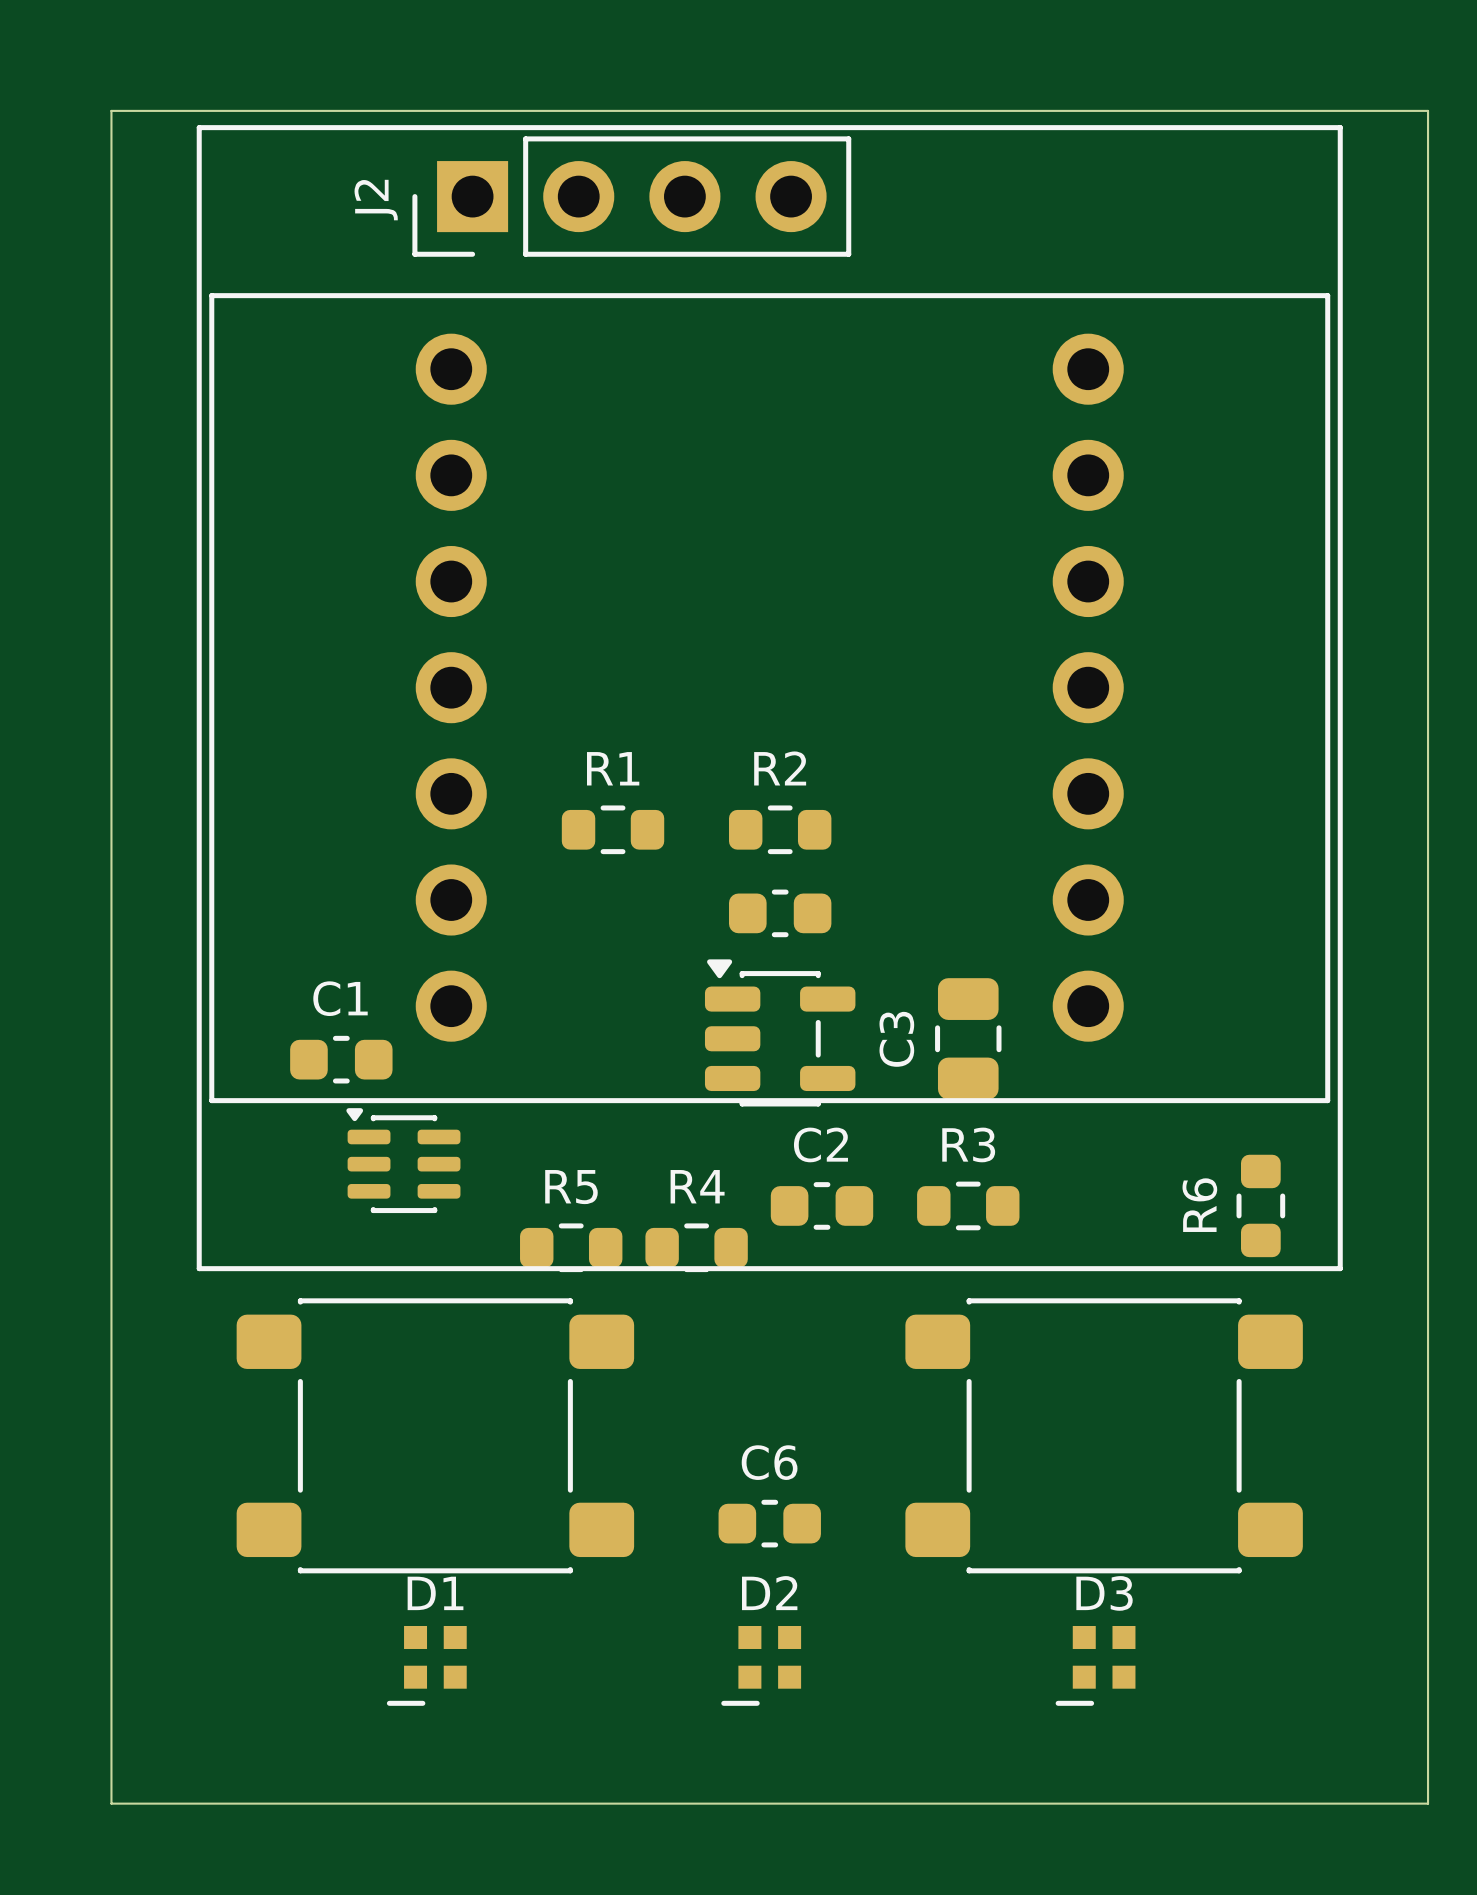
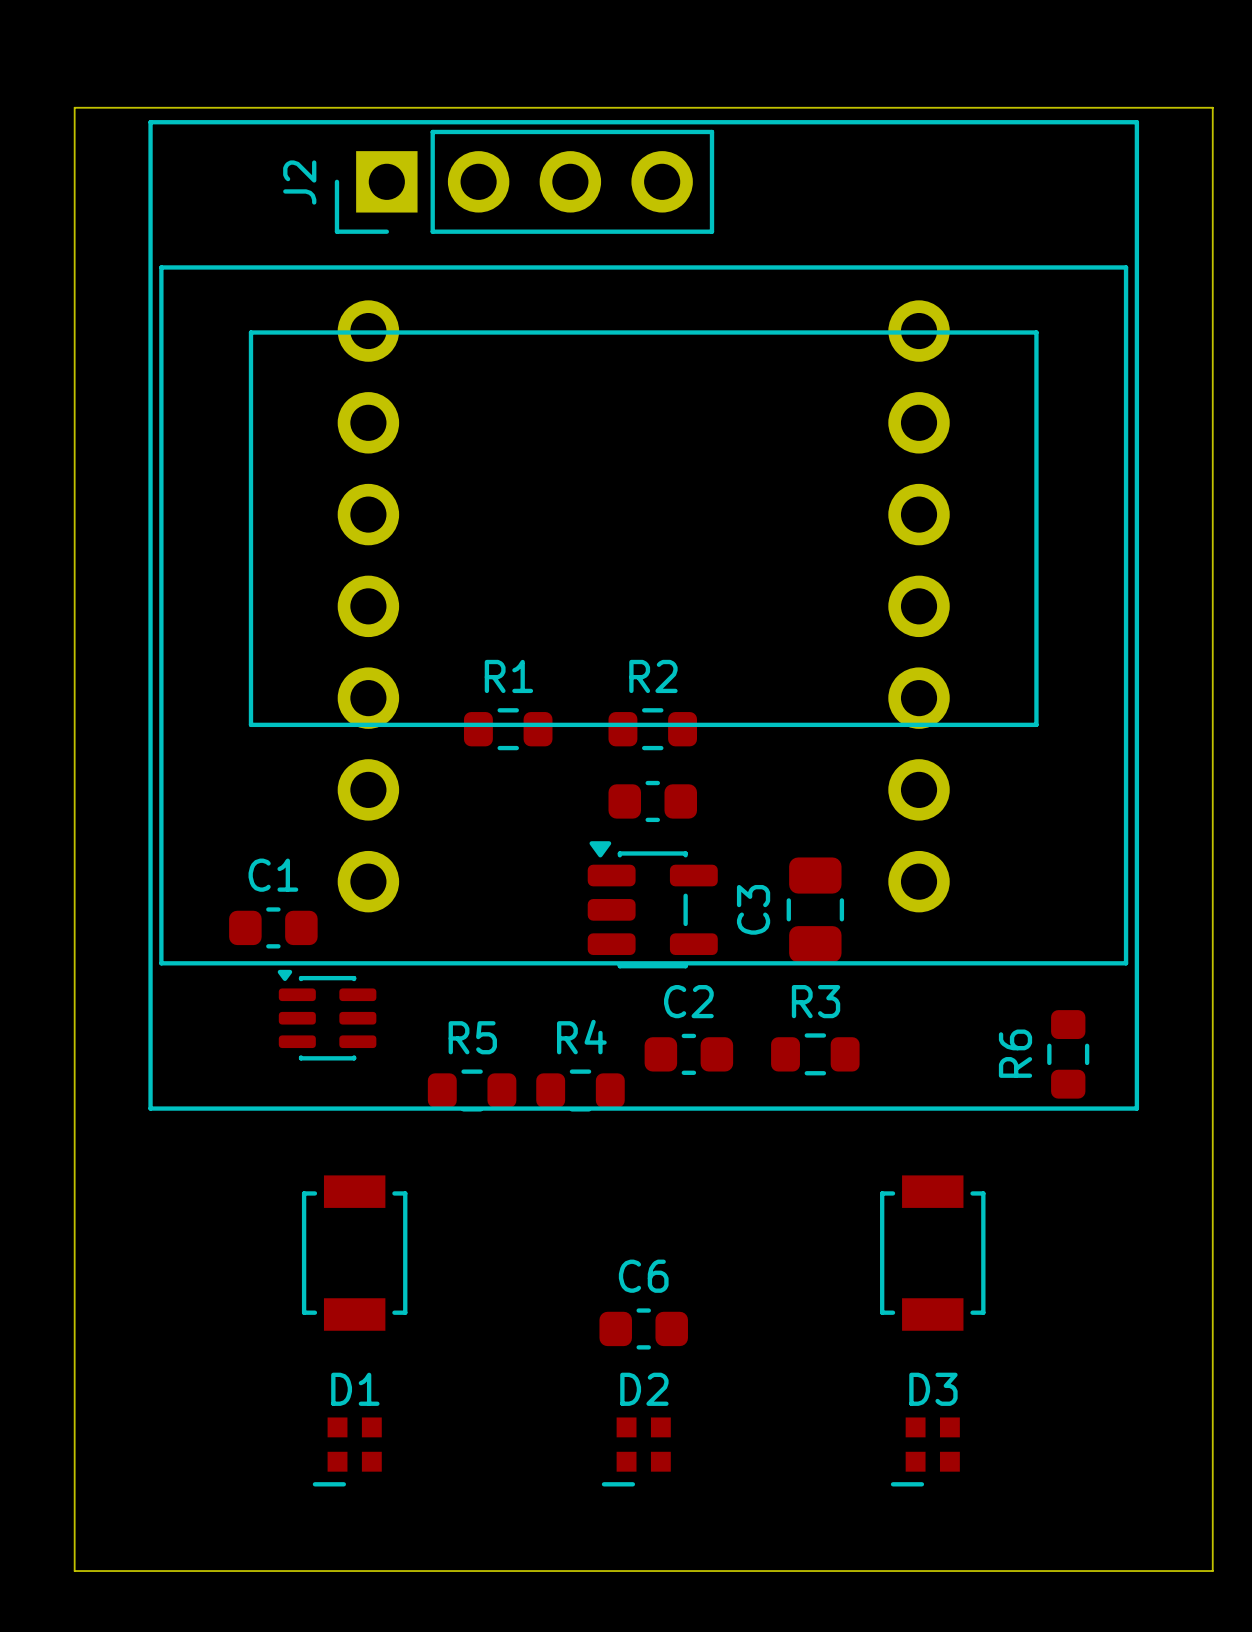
line: none -> (250, 332) (250, 724) (1036, 724) (1036, 332) (250, 332)
part footprint: [236, 1298, 635, 1574] -> [301, 1175, 408, 1331]
part footprint: [905, 1298, 1303, 1574] -> [880, 1175, 986, 1331]

